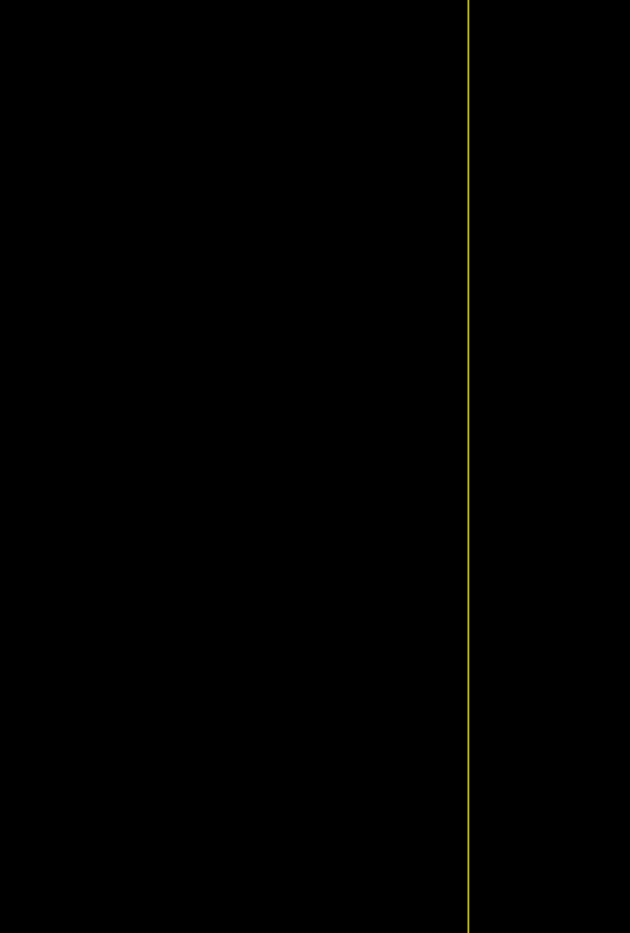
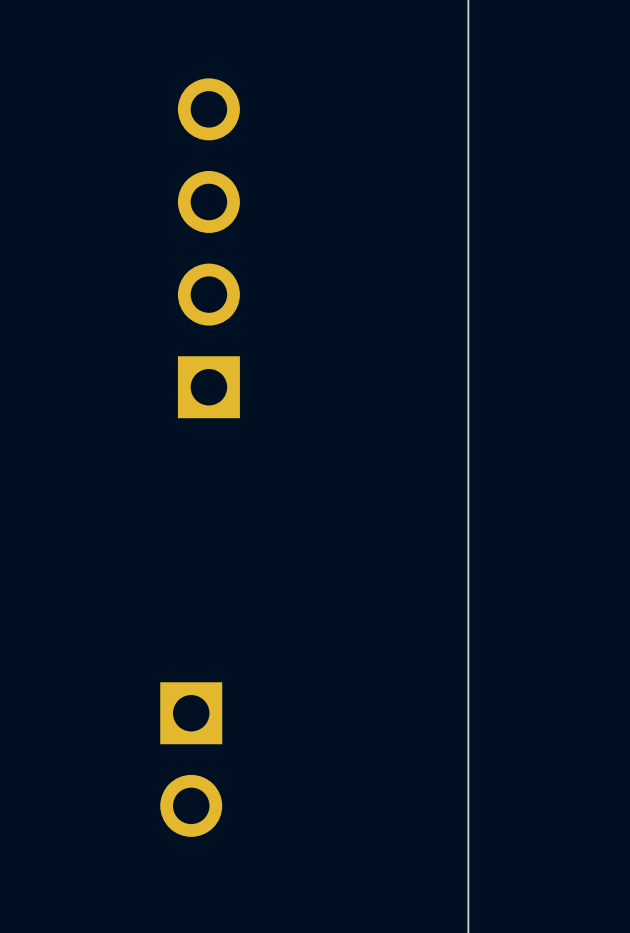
part: none -> (208, 248)
part: none -> (191, 759)

